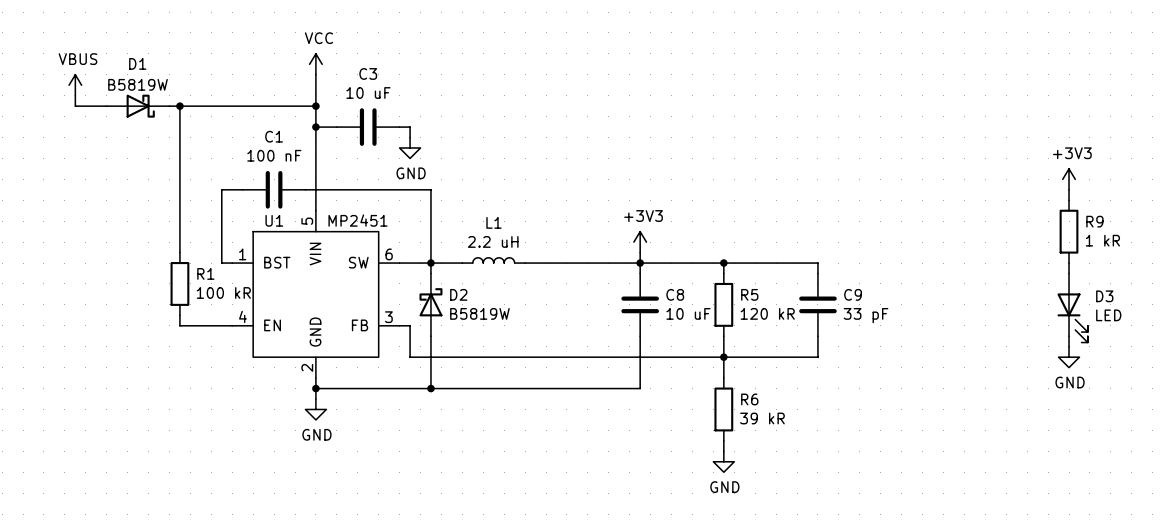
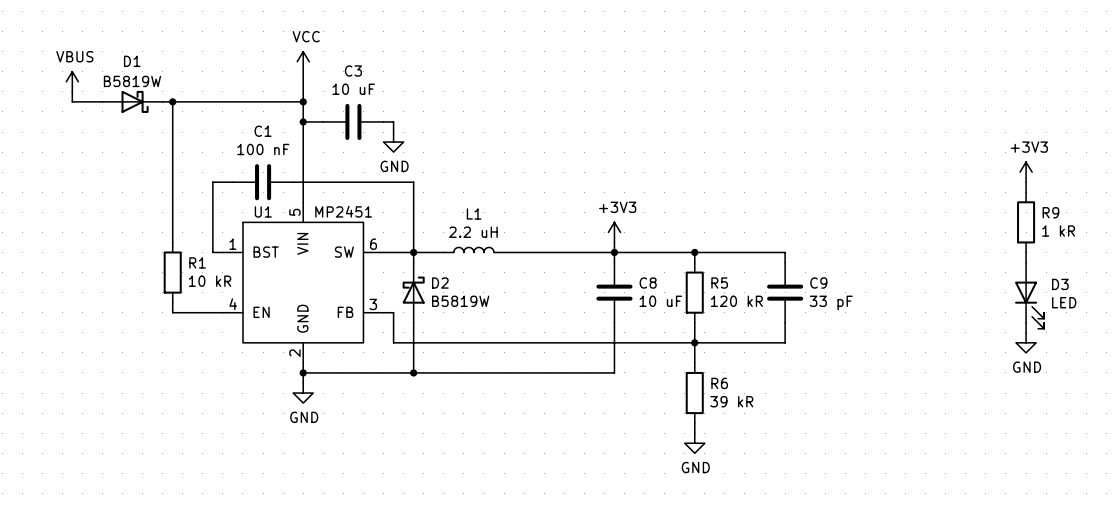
R1 value: 100 kR (223, 292) -> 10 kR (210, 281)

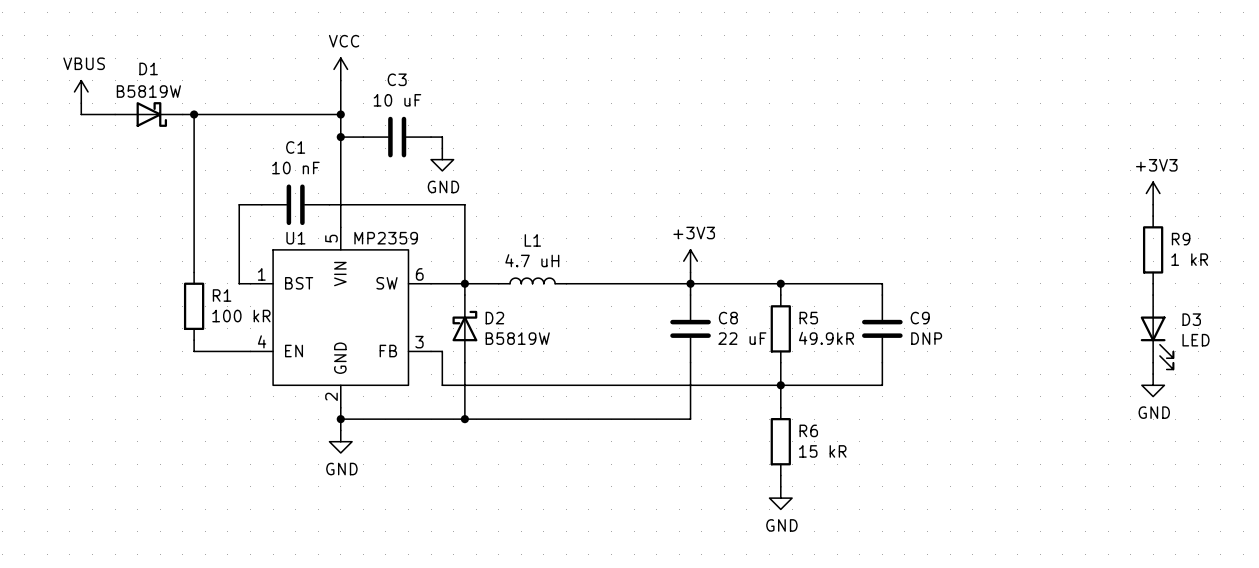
C1 value: 100 nF (263, 149) -> 10 nF (295, 168)
U1 value: MP2451 (343, 211) -> MP2359 (386, 238)
L1 value: 2.2 uH (473, 232) -> 4.7 uH (532, 260)
R1 value: 10 kR (210, 281) -> 100 kR (241, 316)
C8 value: 10 uF (660, 301) -> 22 uF (742, 338)
R5 value: 120 kR (736, 301) -> 49.9kR (826, 338)
C9 value: 33 pF (831, 302) -> DNP (926, 338)
R6 value: 39 kR (731, 401) -> 15 kR (822, 451)

